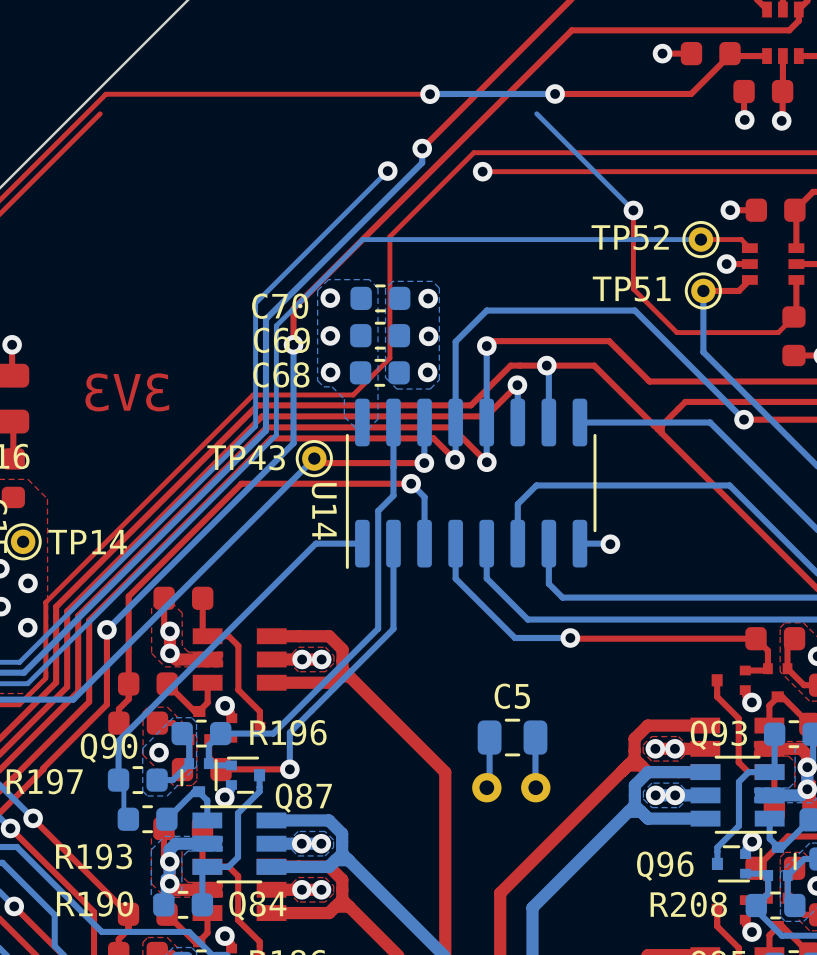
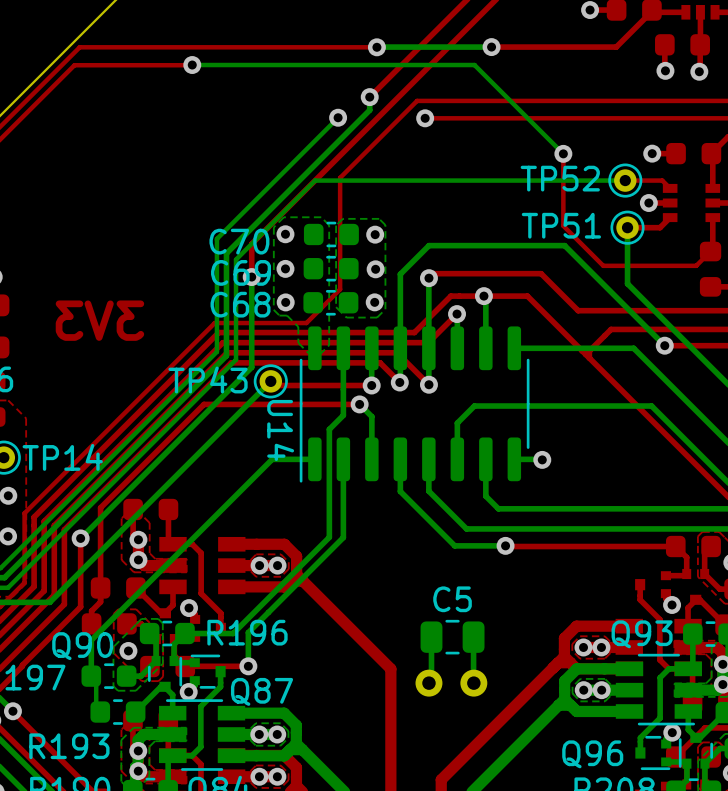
top track: none -> (192, 65) (74, 65)
via: none -> (192, 65)
bottom track: none -> (474, 65) (192, 65)

